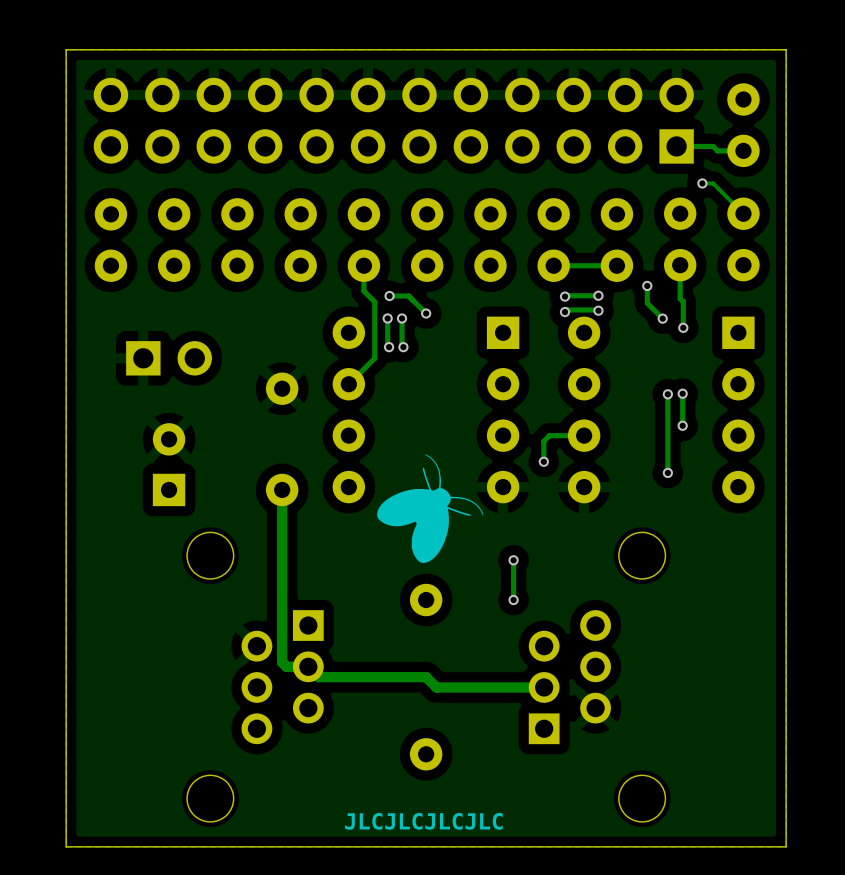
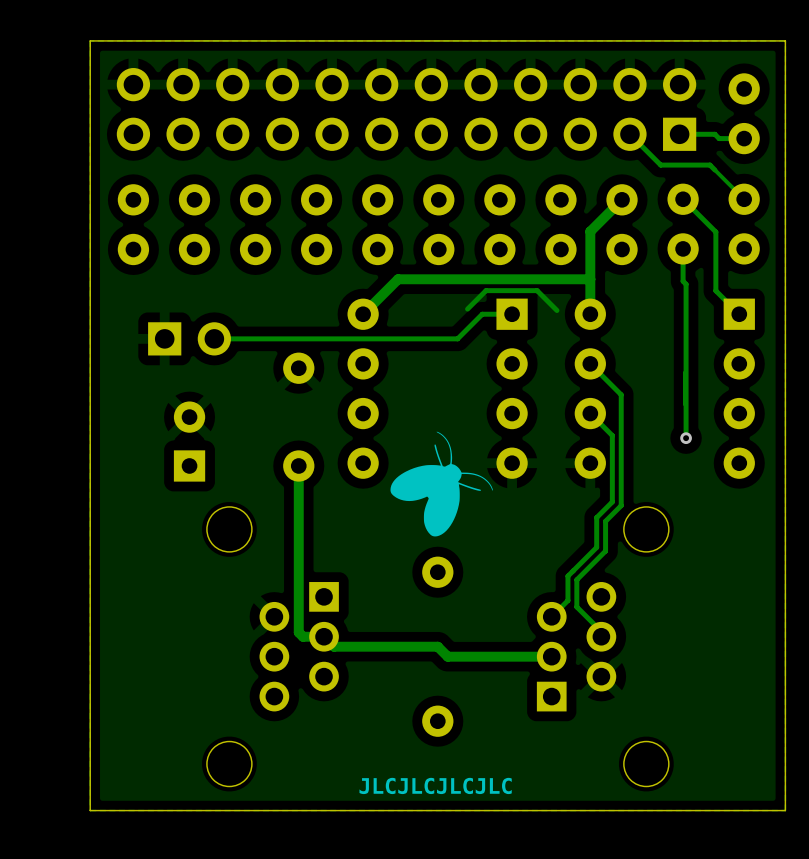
via: (702, 183) -> none
track: (713, 183) (702, 183) -> (714, 170) (709, 165) (660, 165) (629, 134)
track: none -> (683, 199) (715, 232) (715, 290) (739, 314)
track: none -> (622, 199) (590, 231) (590, 314)
track: (363, 265) (363, 291) (374, 302) (374, 358) (348, 384) -> none
track: (616, 265) (553, 265) -> none
track: (647, 285) (647, 303) (662, 318) -> none
via: (647, 285) -> none
track: (598, 295) (565, 296) -> none
via: (598, 295) -> none
track: (389, 296) (408, 296) (426, 313) -> none
via: (389, 296) -> none
via: (565, 296) -> none
track: none -> (590, 279) (398, 279) (363, 314)
track: (598, 310) (567, 309) (565, 312) -> none
via: (598, 310) -> none
via: (565, 312) -> none
via: (426, 313) -> none
track: (387, 318) (389, 347) -> none
via: (387, 318) -> none
track: (402, 318) (403, 347) -> none
via: (402, 318) -> none
via: (662, 318) -> none
track: none -> (467, 309) (486, 290) (537, 290) (556, 310)
track: none -> (686, 309) (686, 438)
via: (683, 327) -> none
track: none -> (512, 314) (482, 314) (457, 338) (214, 338)
via: (389, 347) -> none
via: (403, 347) -> none
track: none -> (590, 363) (621, 394) (621, 505) (605, 521) (605, 551) (576, 579) (576, 606) (601, 631)
via: (682, 393) -> none
track: (667, 394) (667, 472) -> none
via: (667, 394) -> none
via: (682, 425) -> none
track: (584, 435) (549, 435) (543, 441) (543, 461) -> (590, 413) (612, 435) (612, 501) (596, 517) (596, 547) (567, 576) (567, 600) (551, 616)
via: (543, 461) -> none
via: none -> (686, 438)
via: (667, 472) -> none
track: (513, 560) (513, 600) -> none
via: (513, 560) -> none
via: (513, 600) -> none

